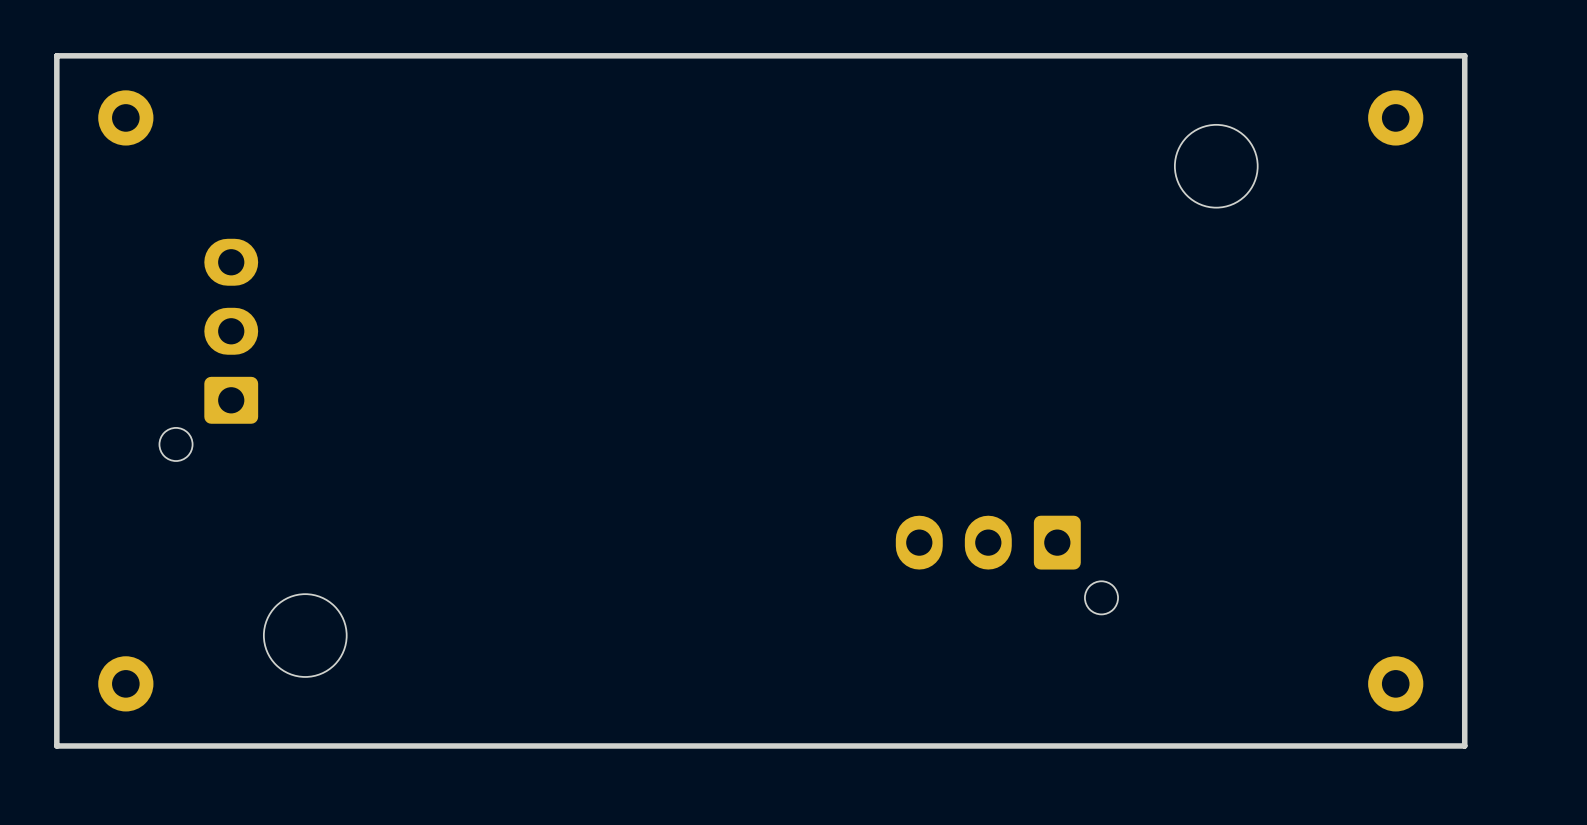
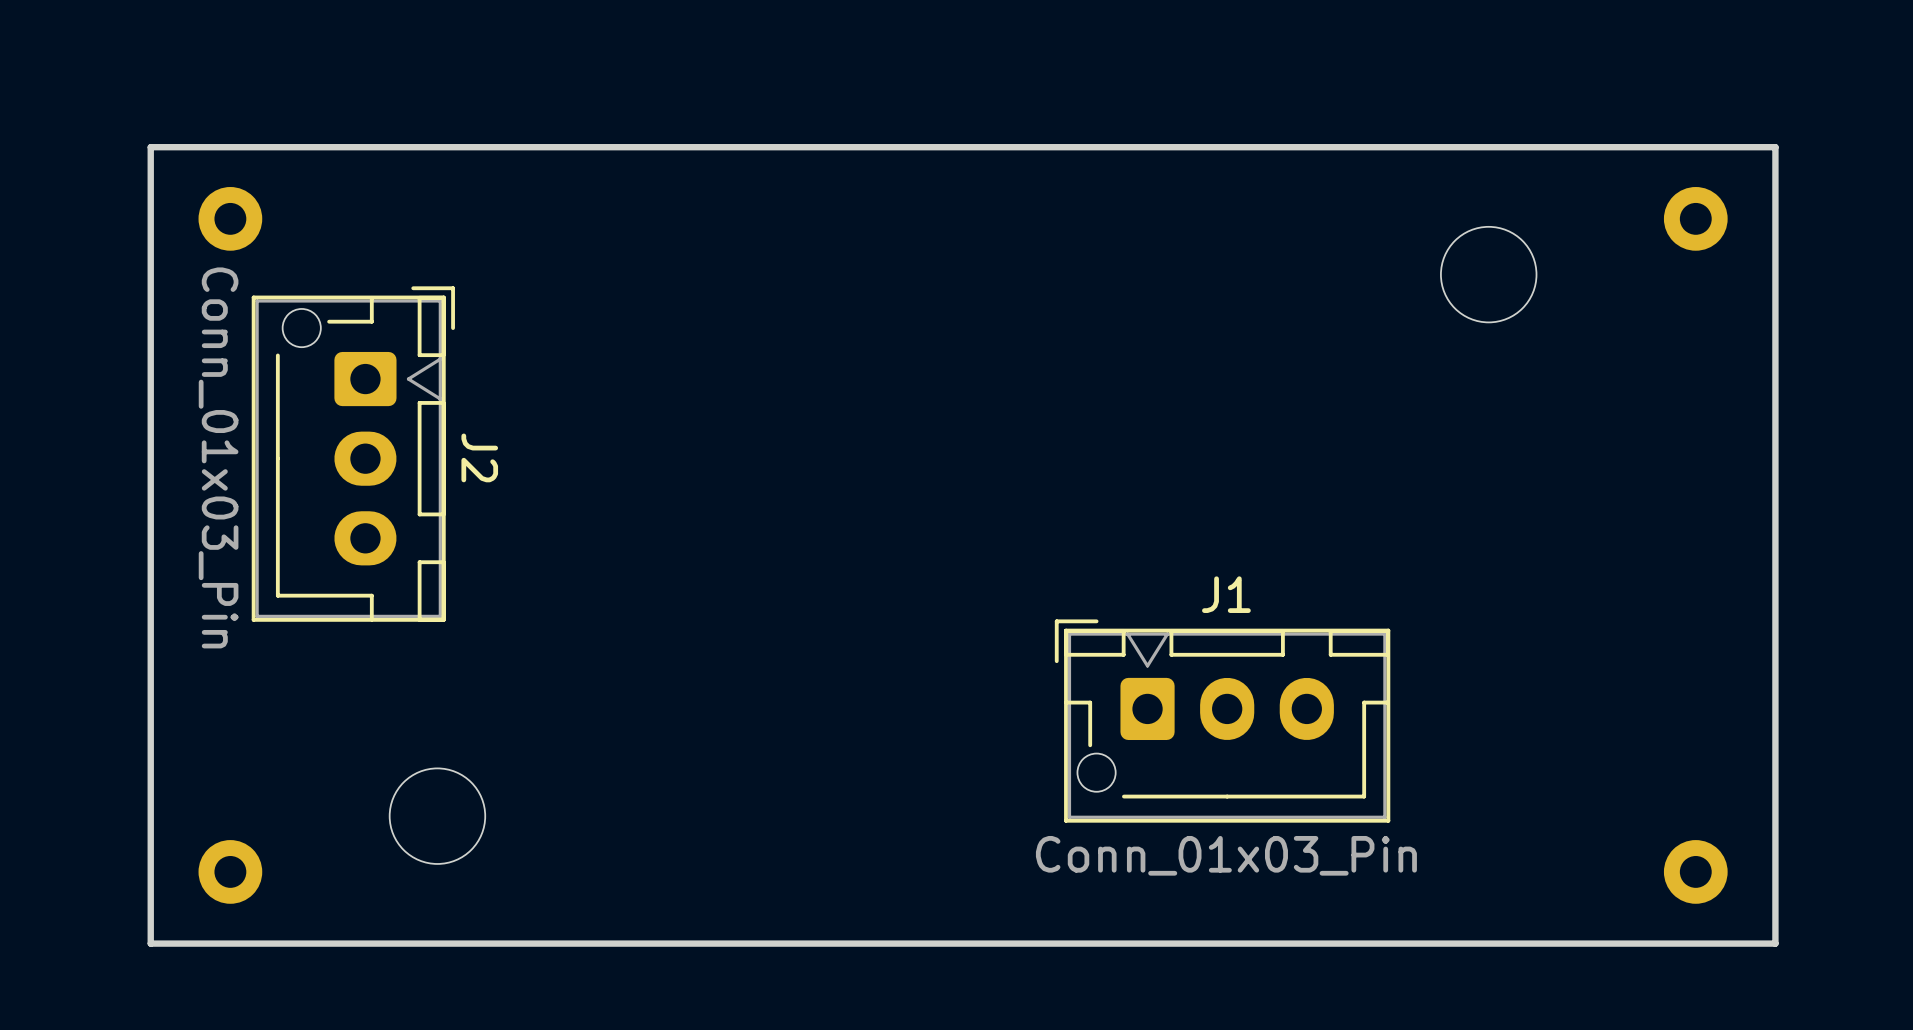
J2 side: top (208, 349) -> bottom (353, 454)
J1 side: top (1006, 565) -> bottom (1222, 721)

